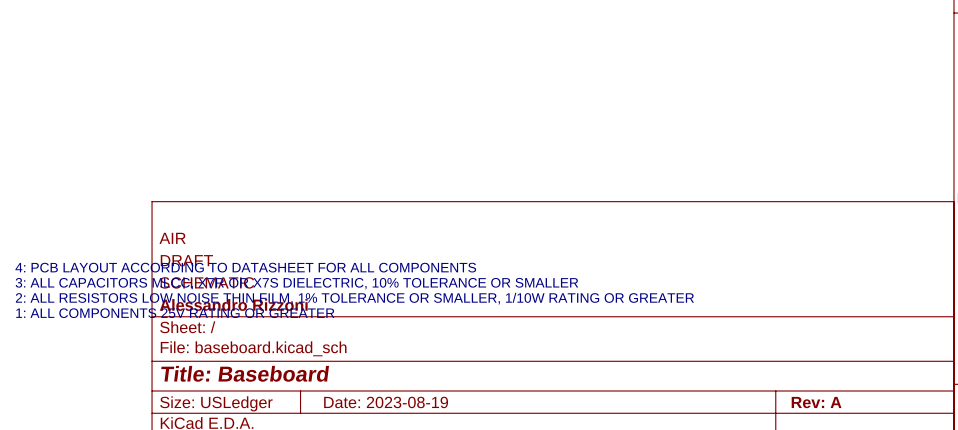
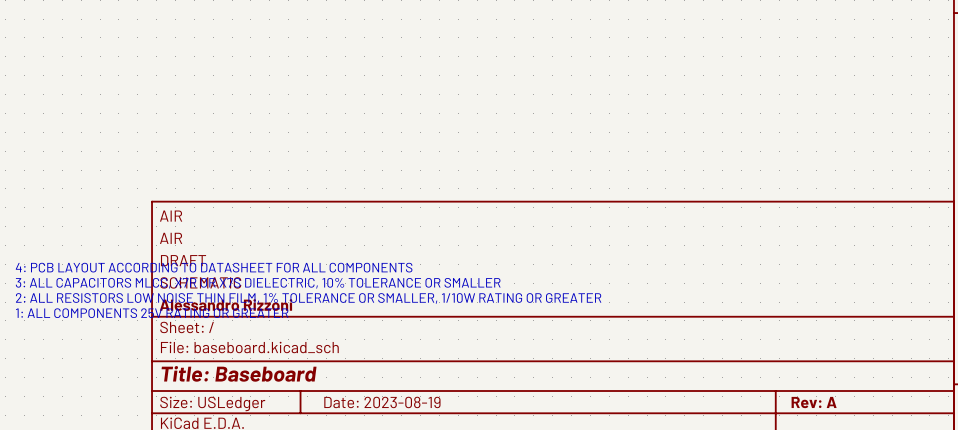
title block: none -> AIR (171, 216)

